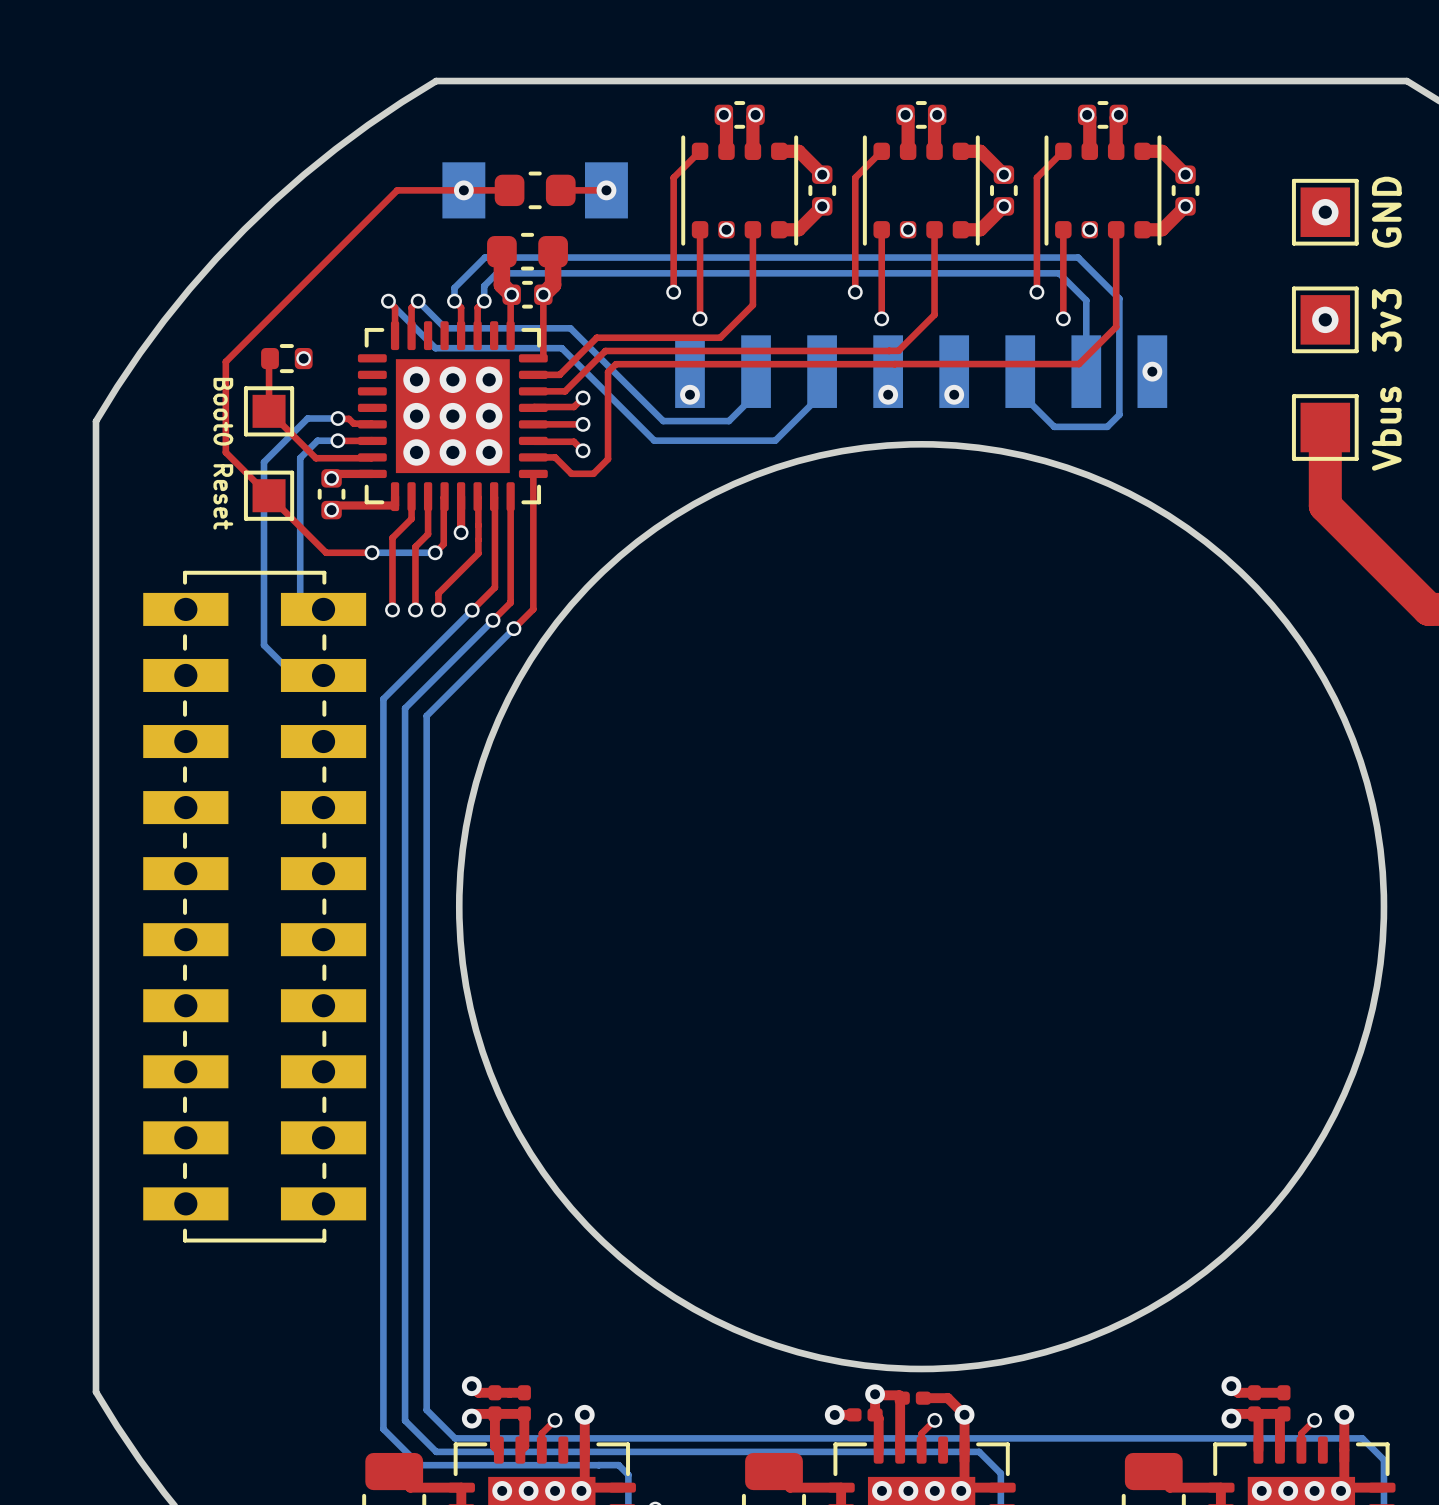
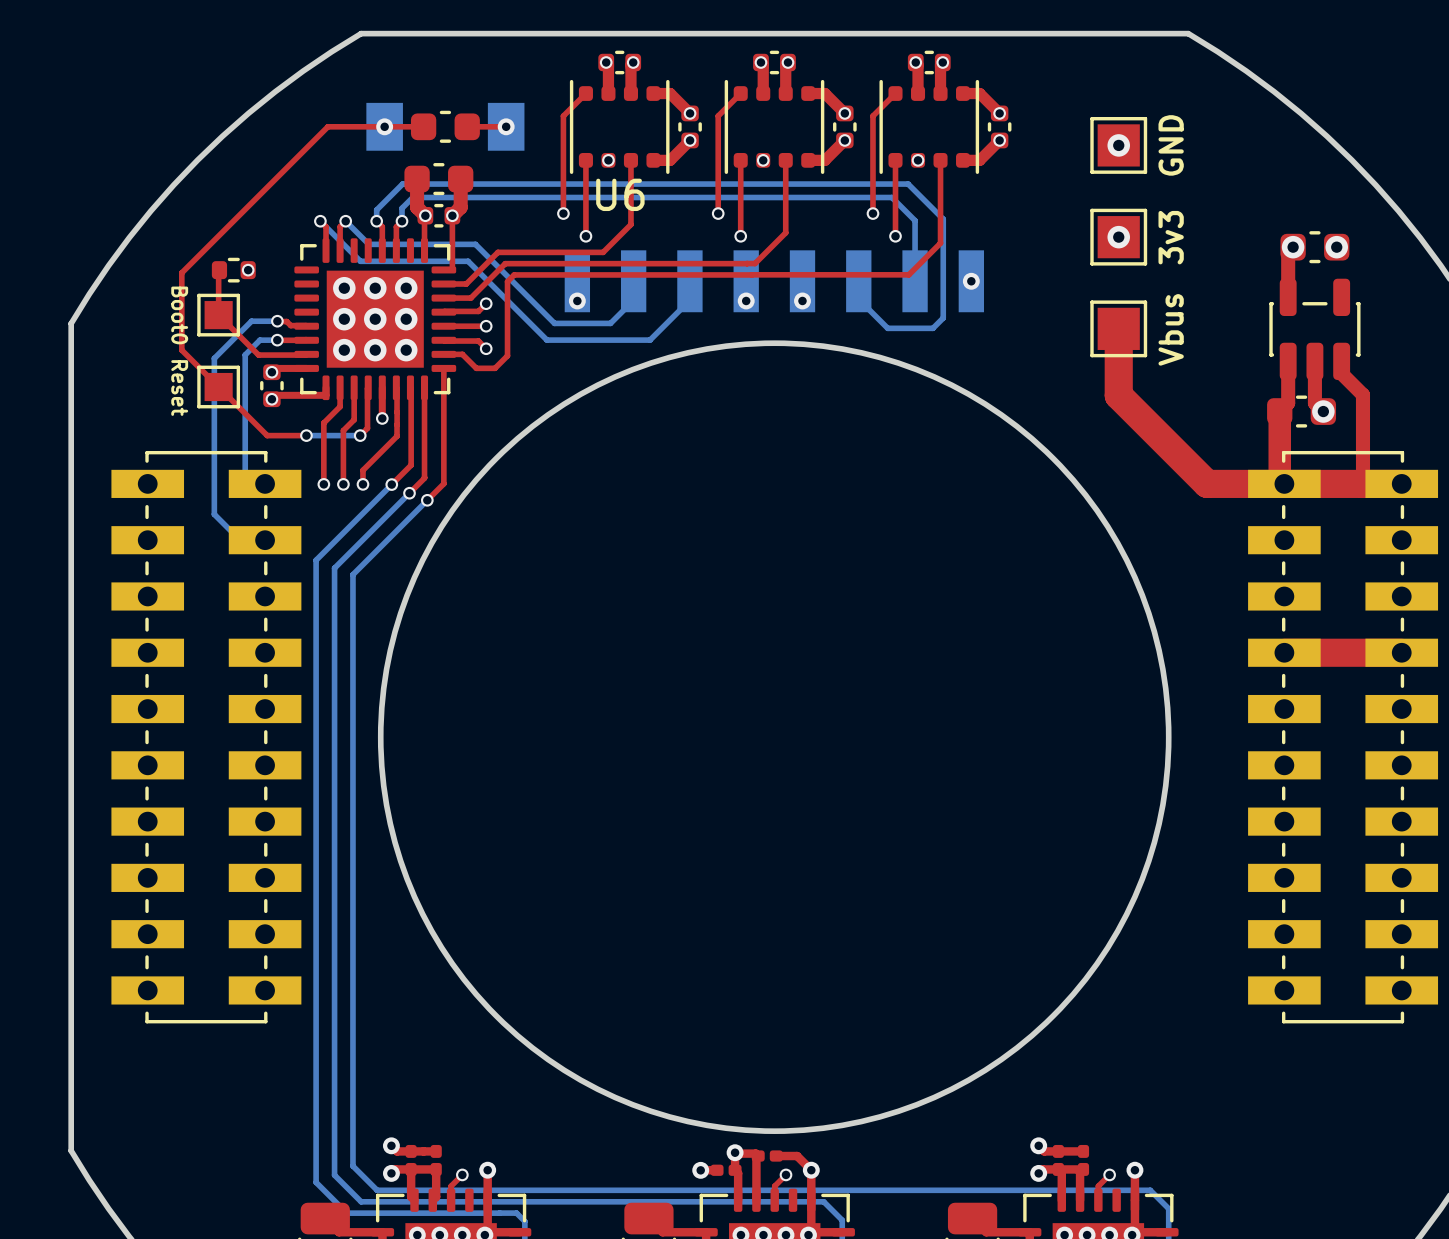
U6 name: none -> U6 (620, 194)

